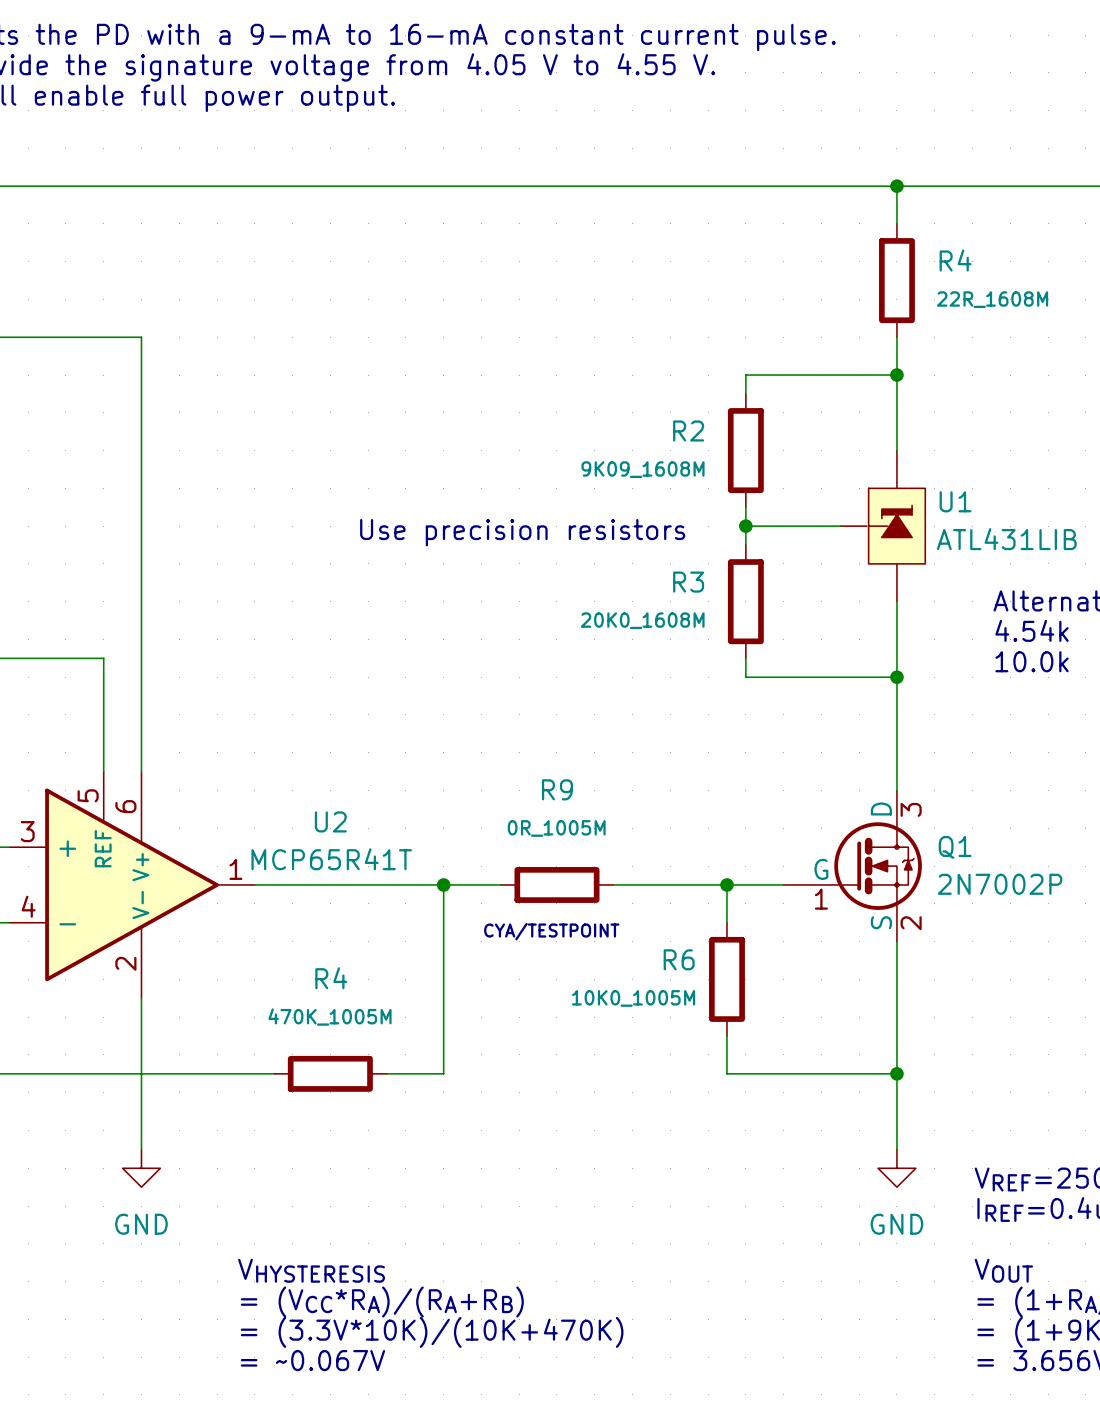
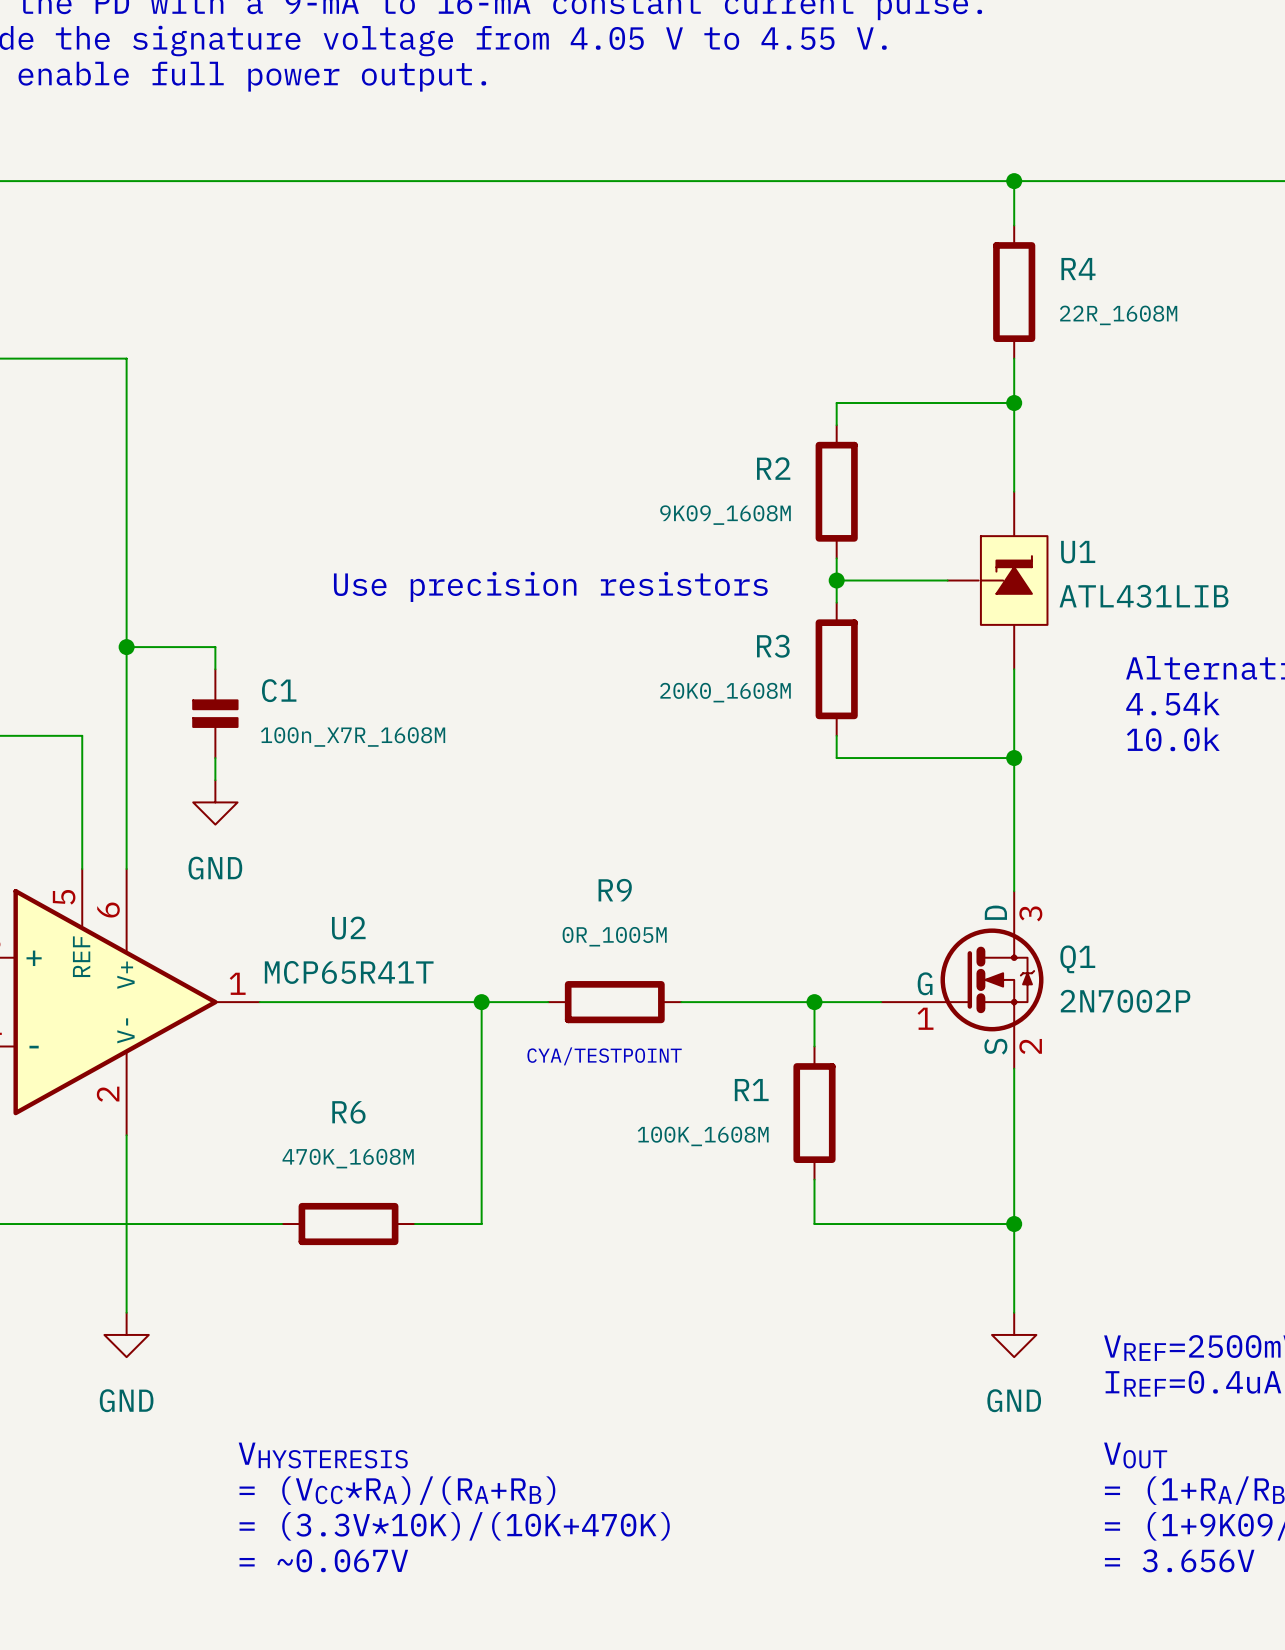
wire: none -> (126, 647) (215, 647) (215, 669)
junction: none -> (126, 647)
C1: none -> 100n_X7R_1608M (215, 713)
wire: none -> (215, 758) (215, 780)
power symbol: none -> GND (215, 802)
R6 name: R6 (679, 959) -> R1 (751, 1090)
R4 name: R4 (331, 978) -> R6 (348, 1112)
R6 value: 10K0_1005M (633, 998) -> 100K_1608M (703, 1136)
R4 value: 470K_1005M (330, 1017) -> 470K_1608M (348, 1158)

